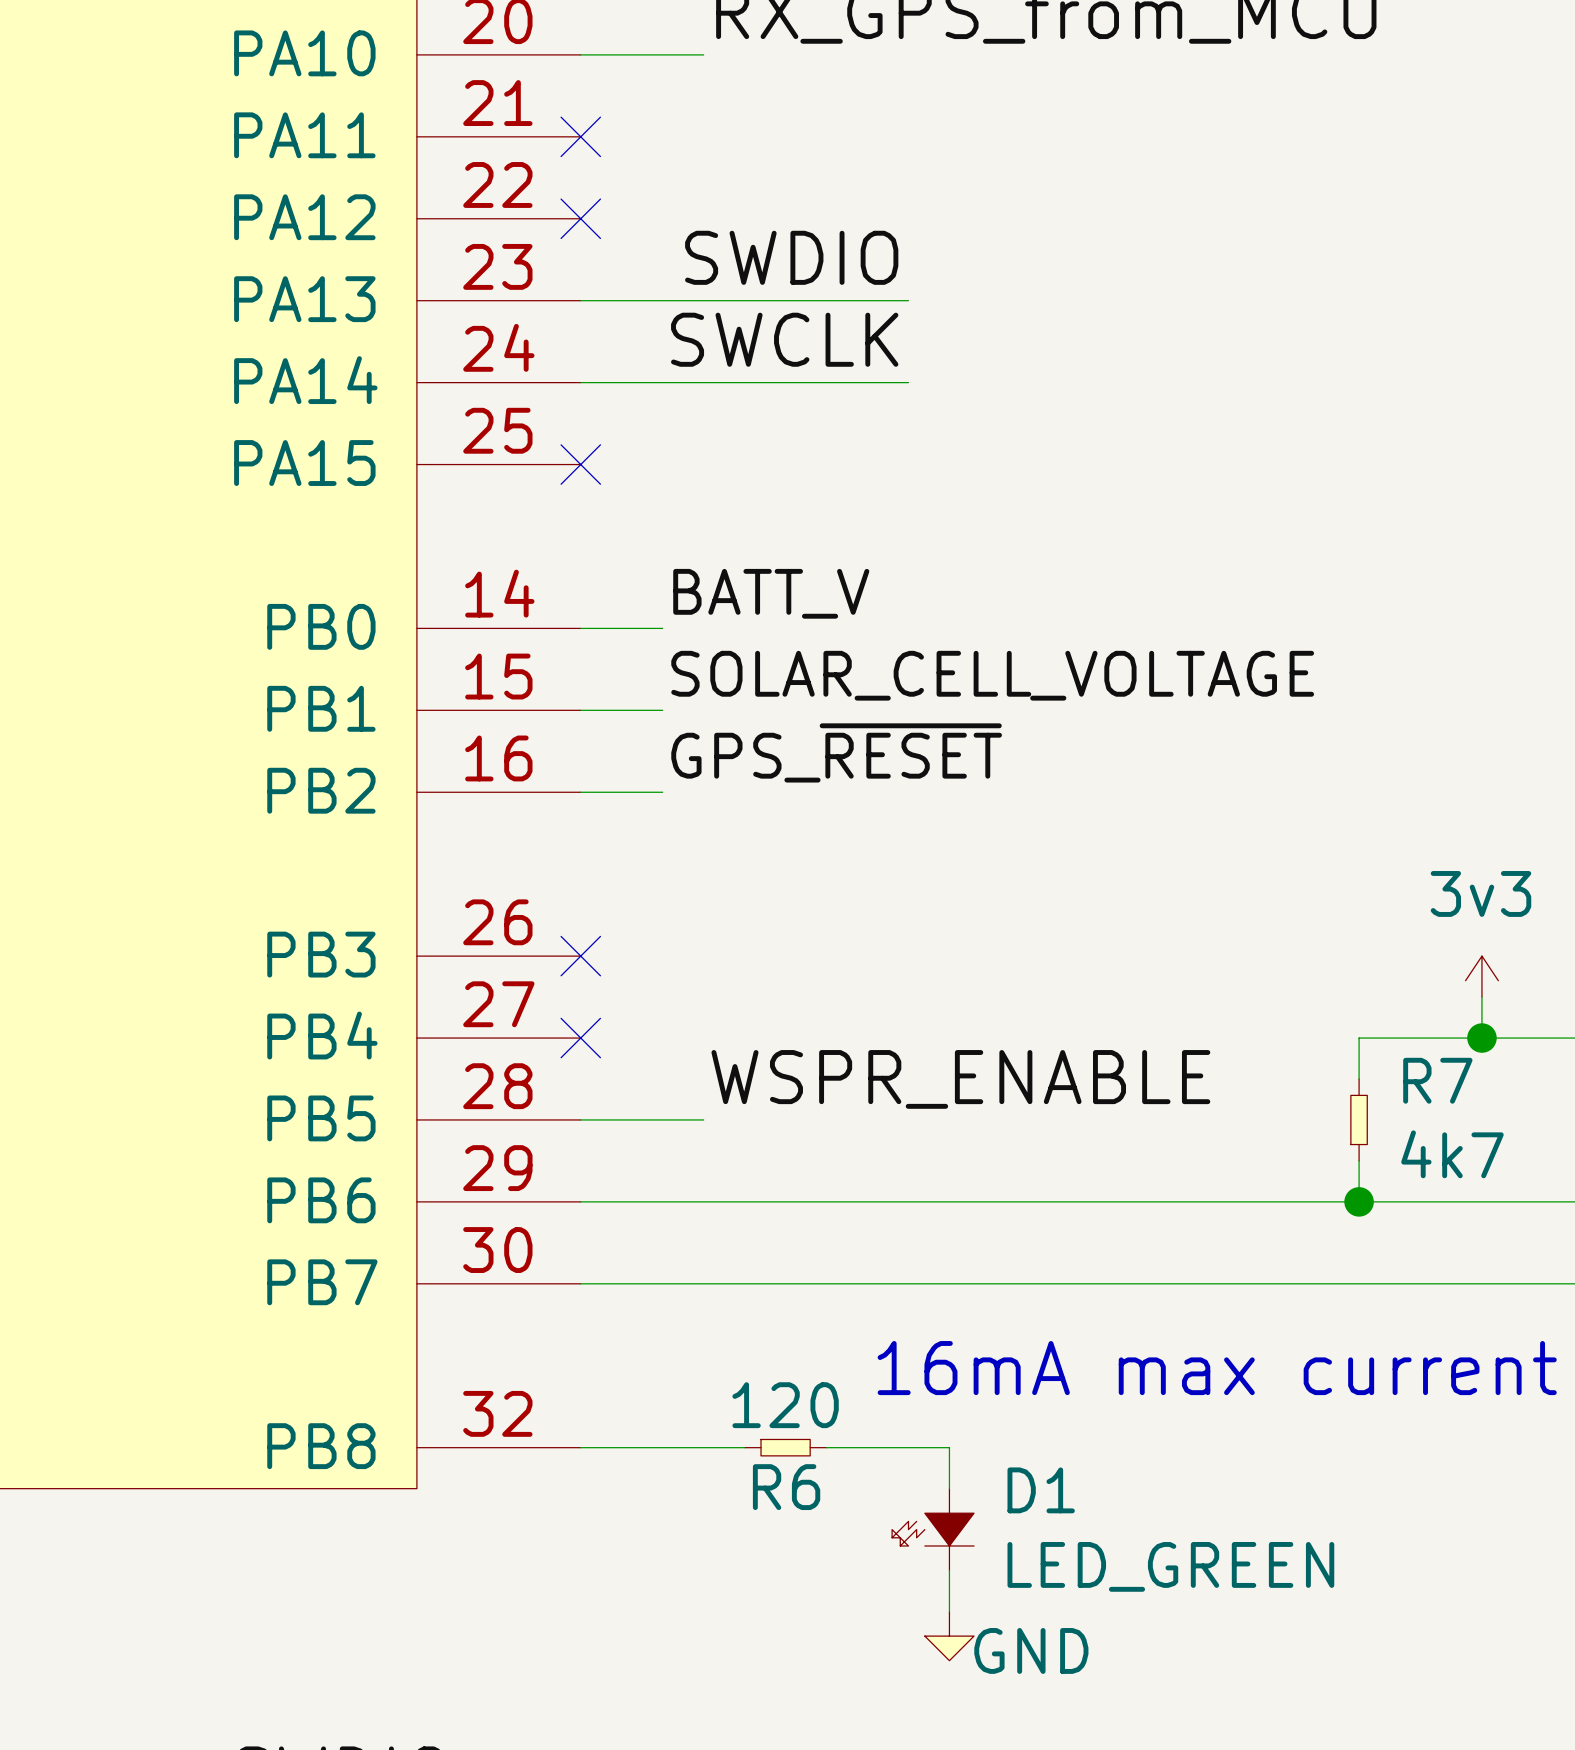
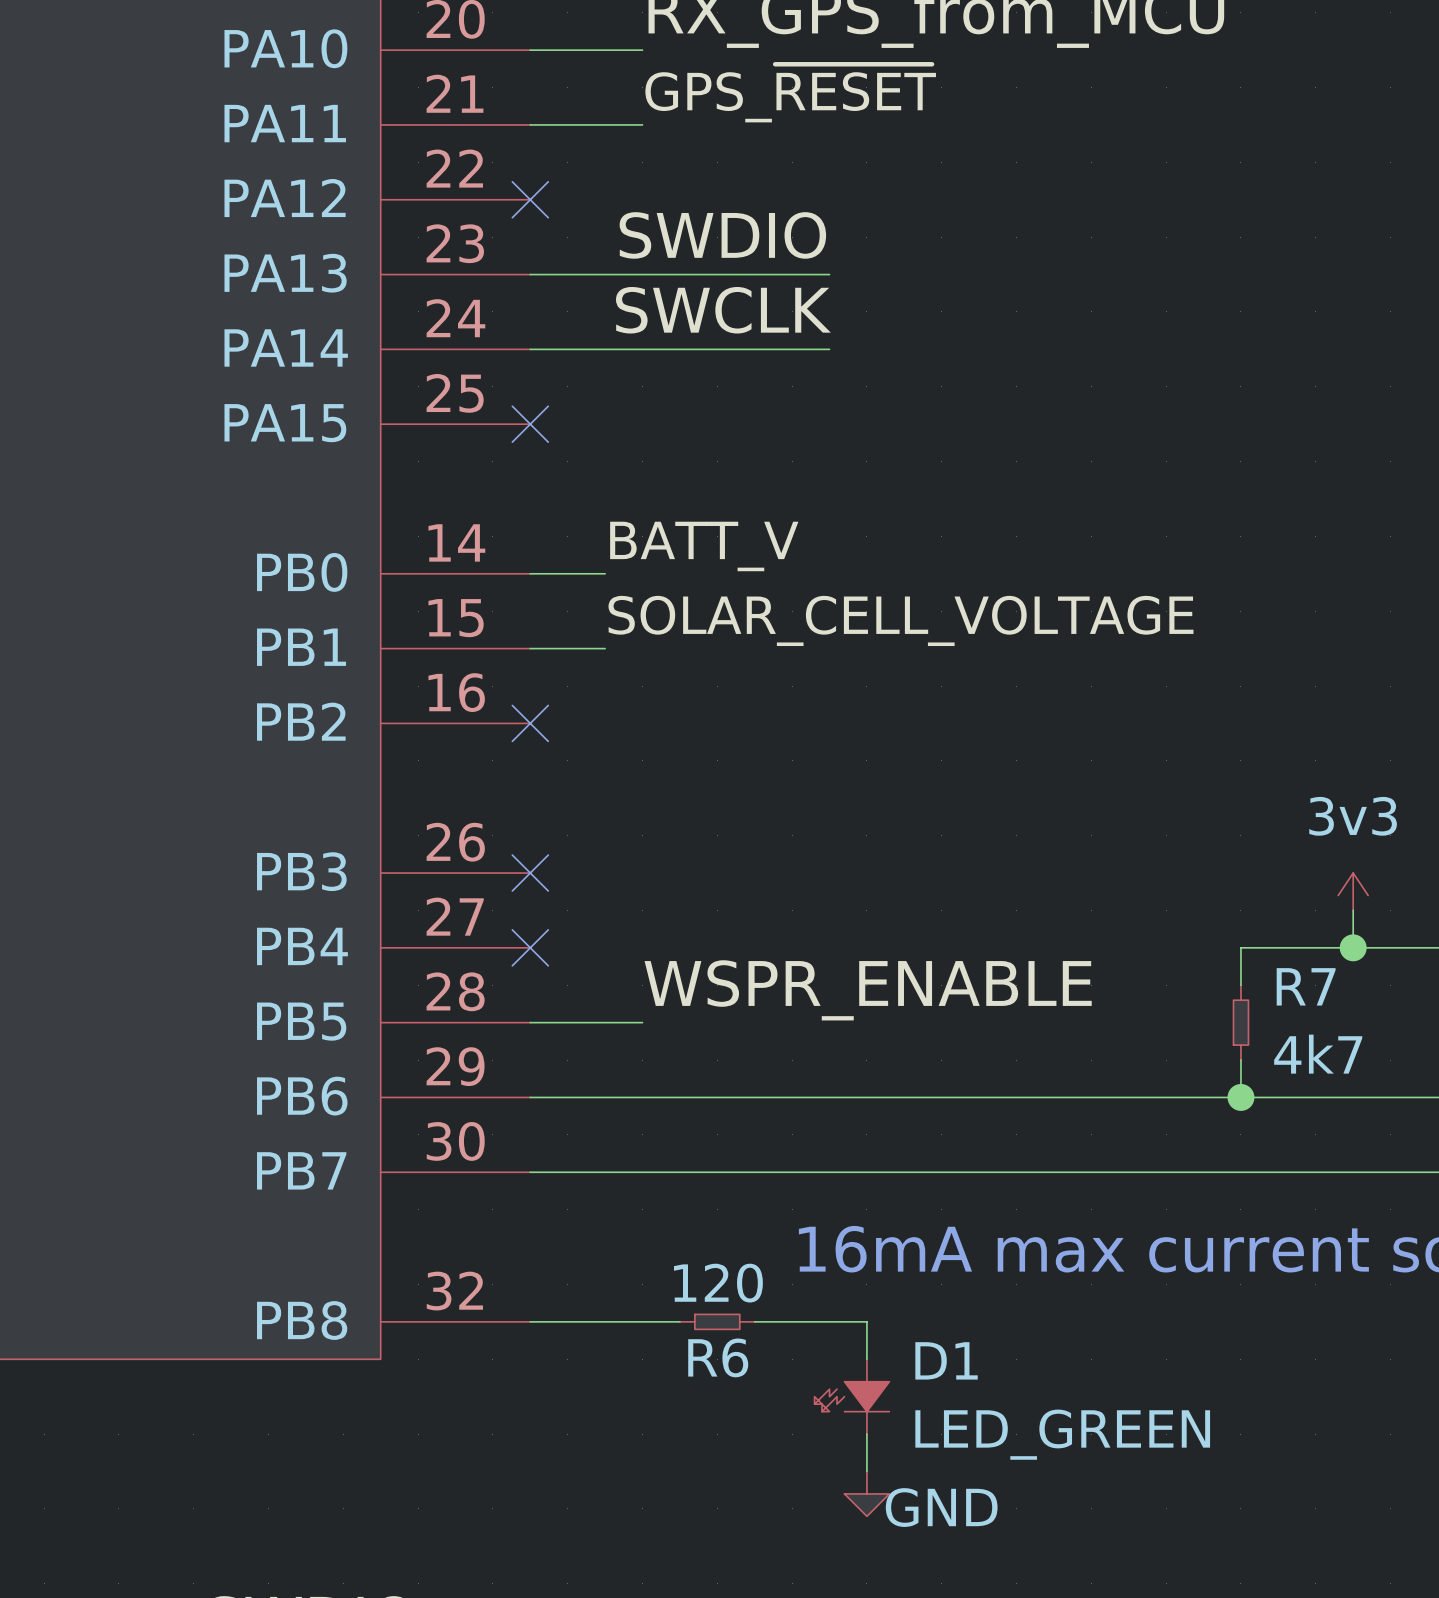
wire: none -> (530, 124) (642, 124)
no-connect mark: (580, 136) -> none
label position: GPS_~{RESET} (836, 752) -> GPS_~{RESET} (790, 93)
wire: (580, 792) (662, 792) -> none
no-connect mark: none -> (530, 723)

